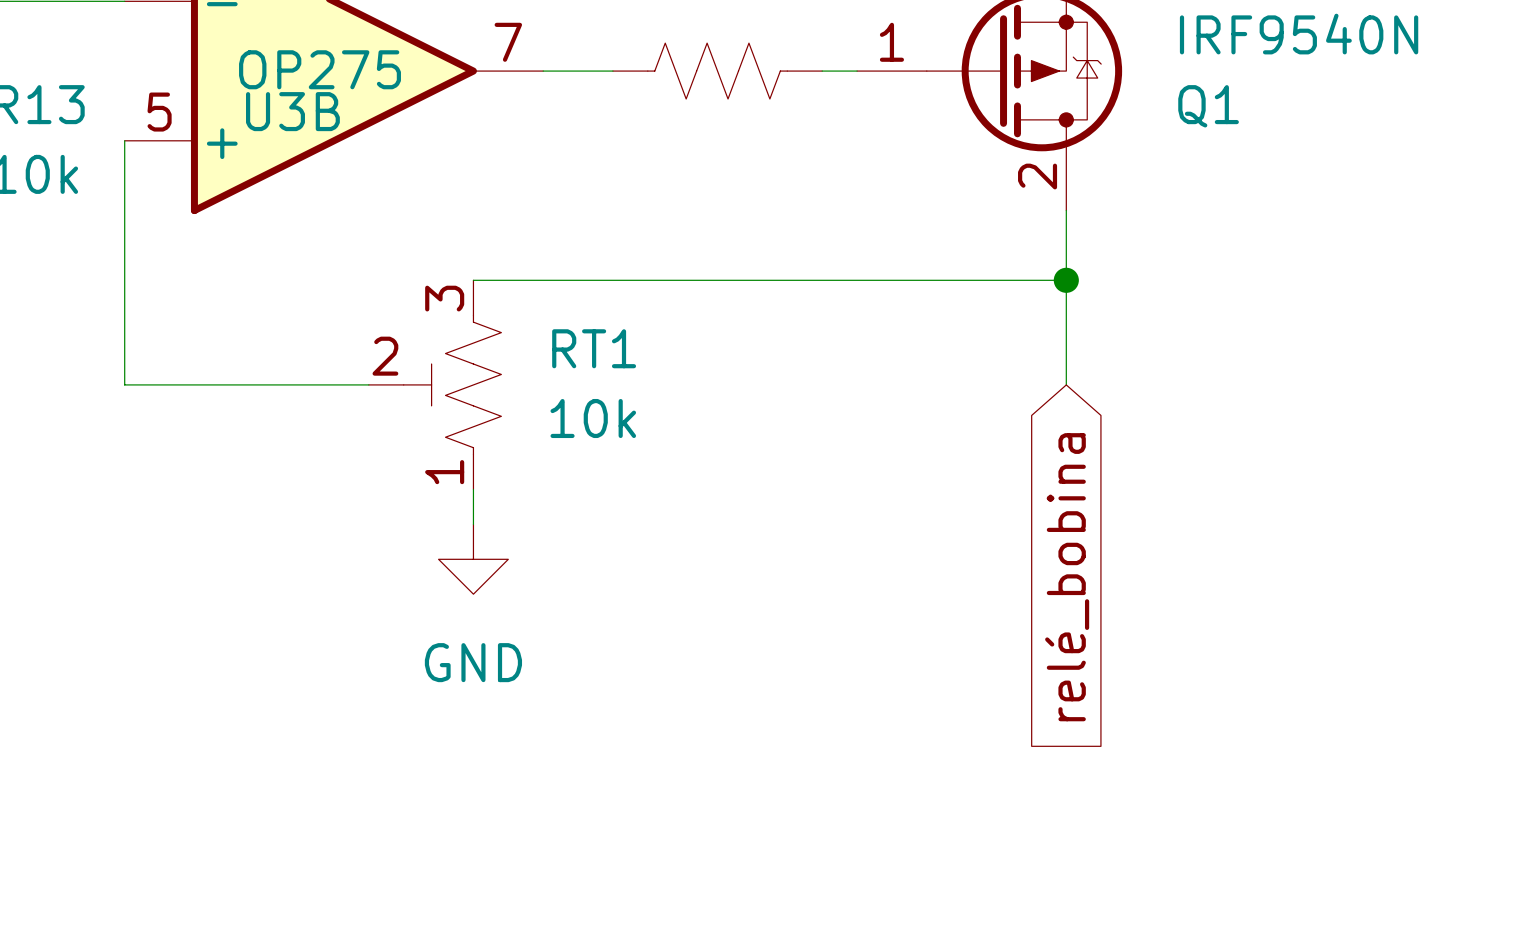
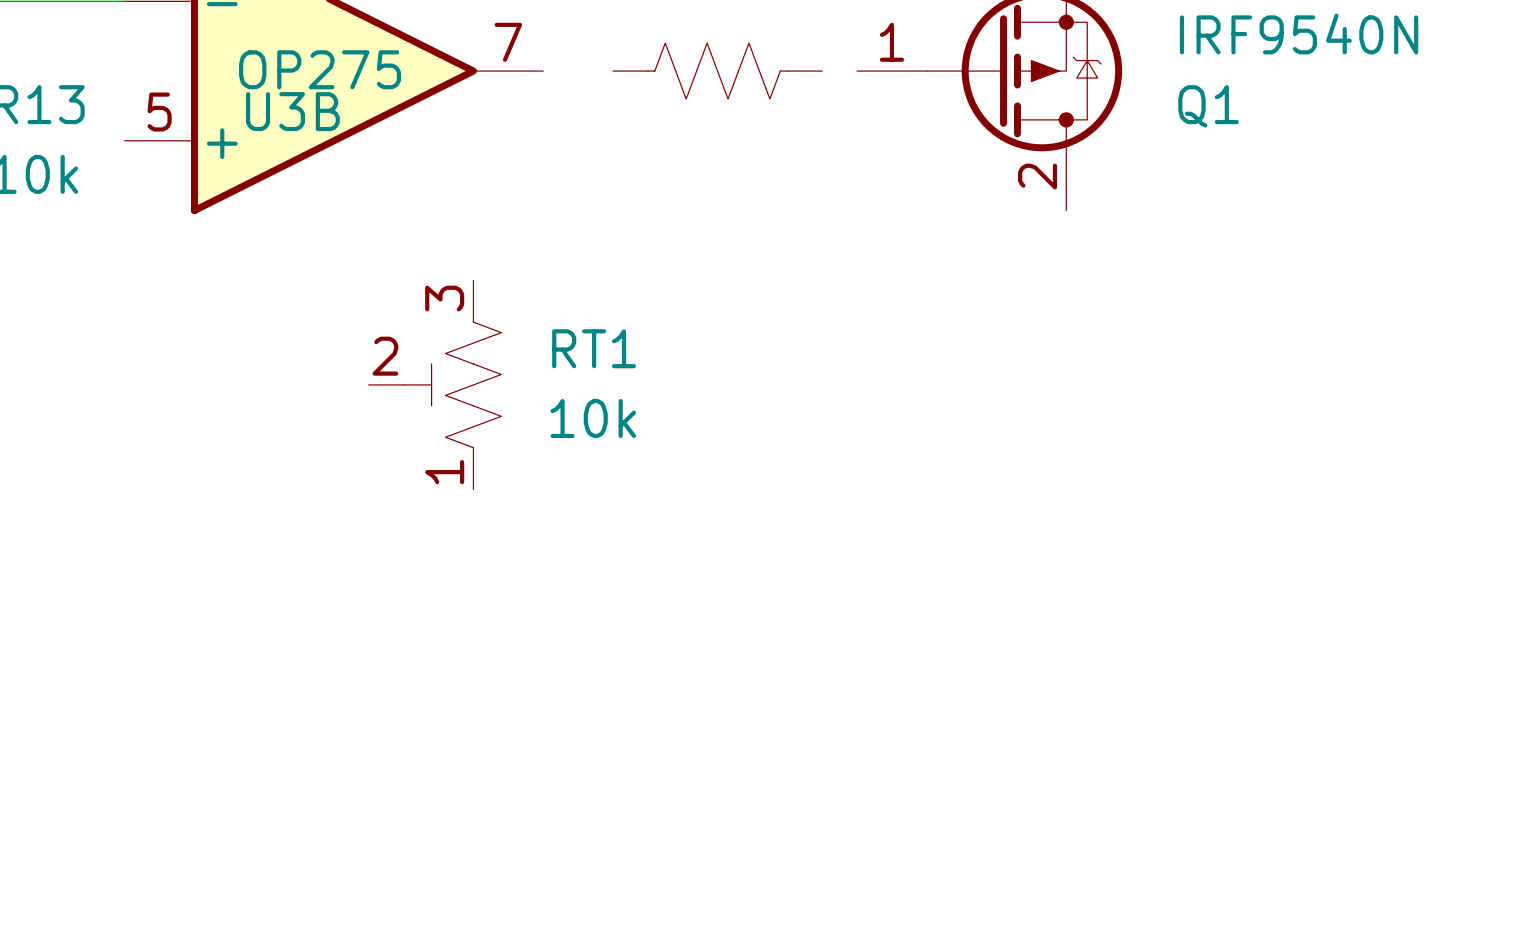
wire: (543, 71) (612, 71) -> none
wire: (822, 71) (857, 71) -> none
wire: (124, 140) (124, 384) (368, 384) -> none
wire: (1066, 210) (1066, 384) -> none
wire: (473, 280) (1066, 280) -> none
junction: (1066, 280) -> none
wire: (473, 489) (473, 524) -> none
power symbol: GND (473, 559) -> none
global label: relé_bobina (1067, 577) -> none

